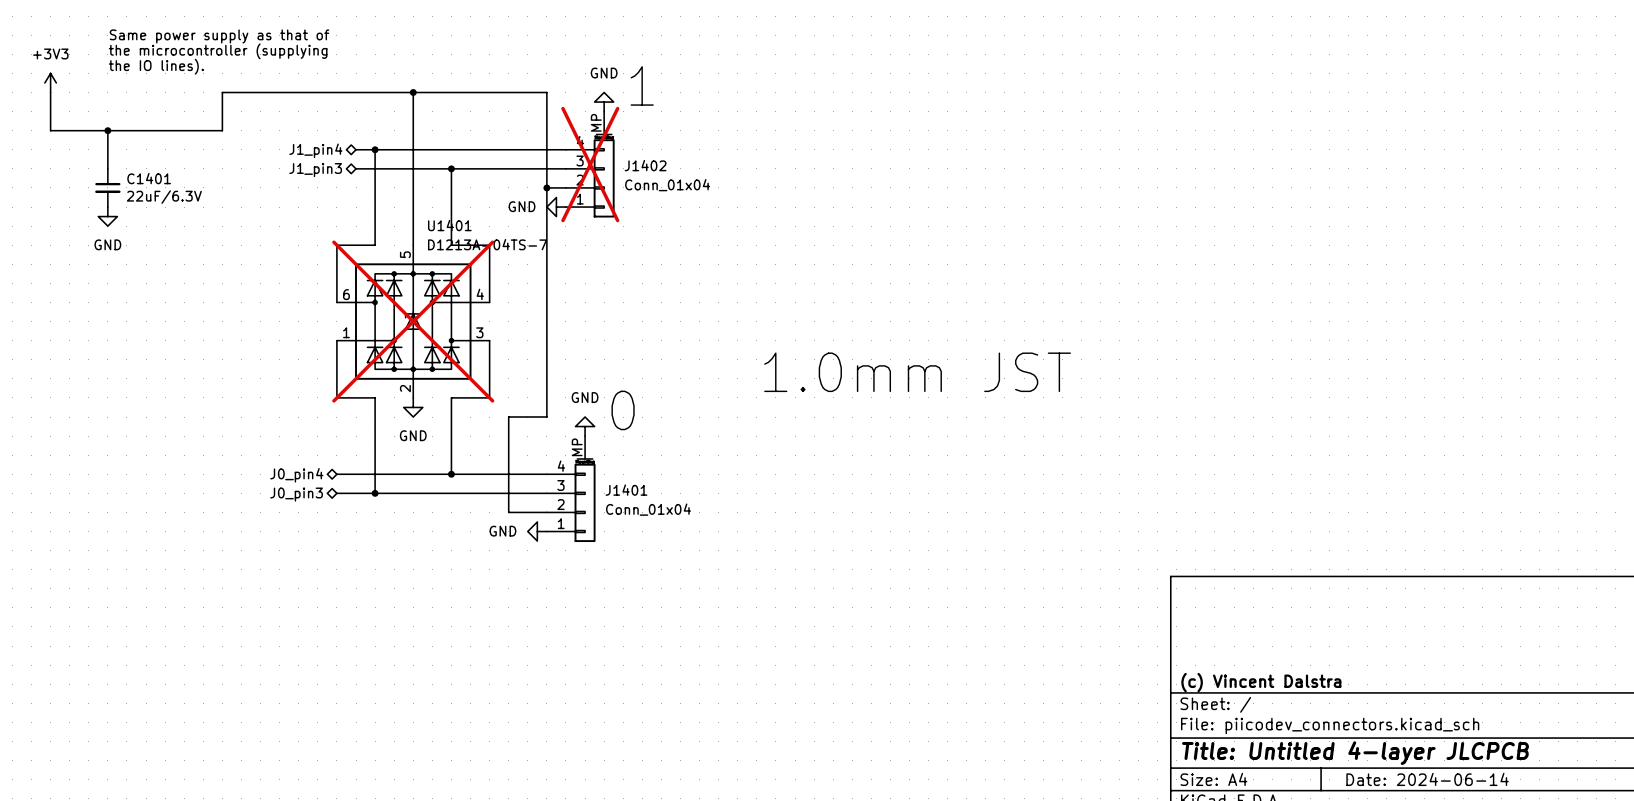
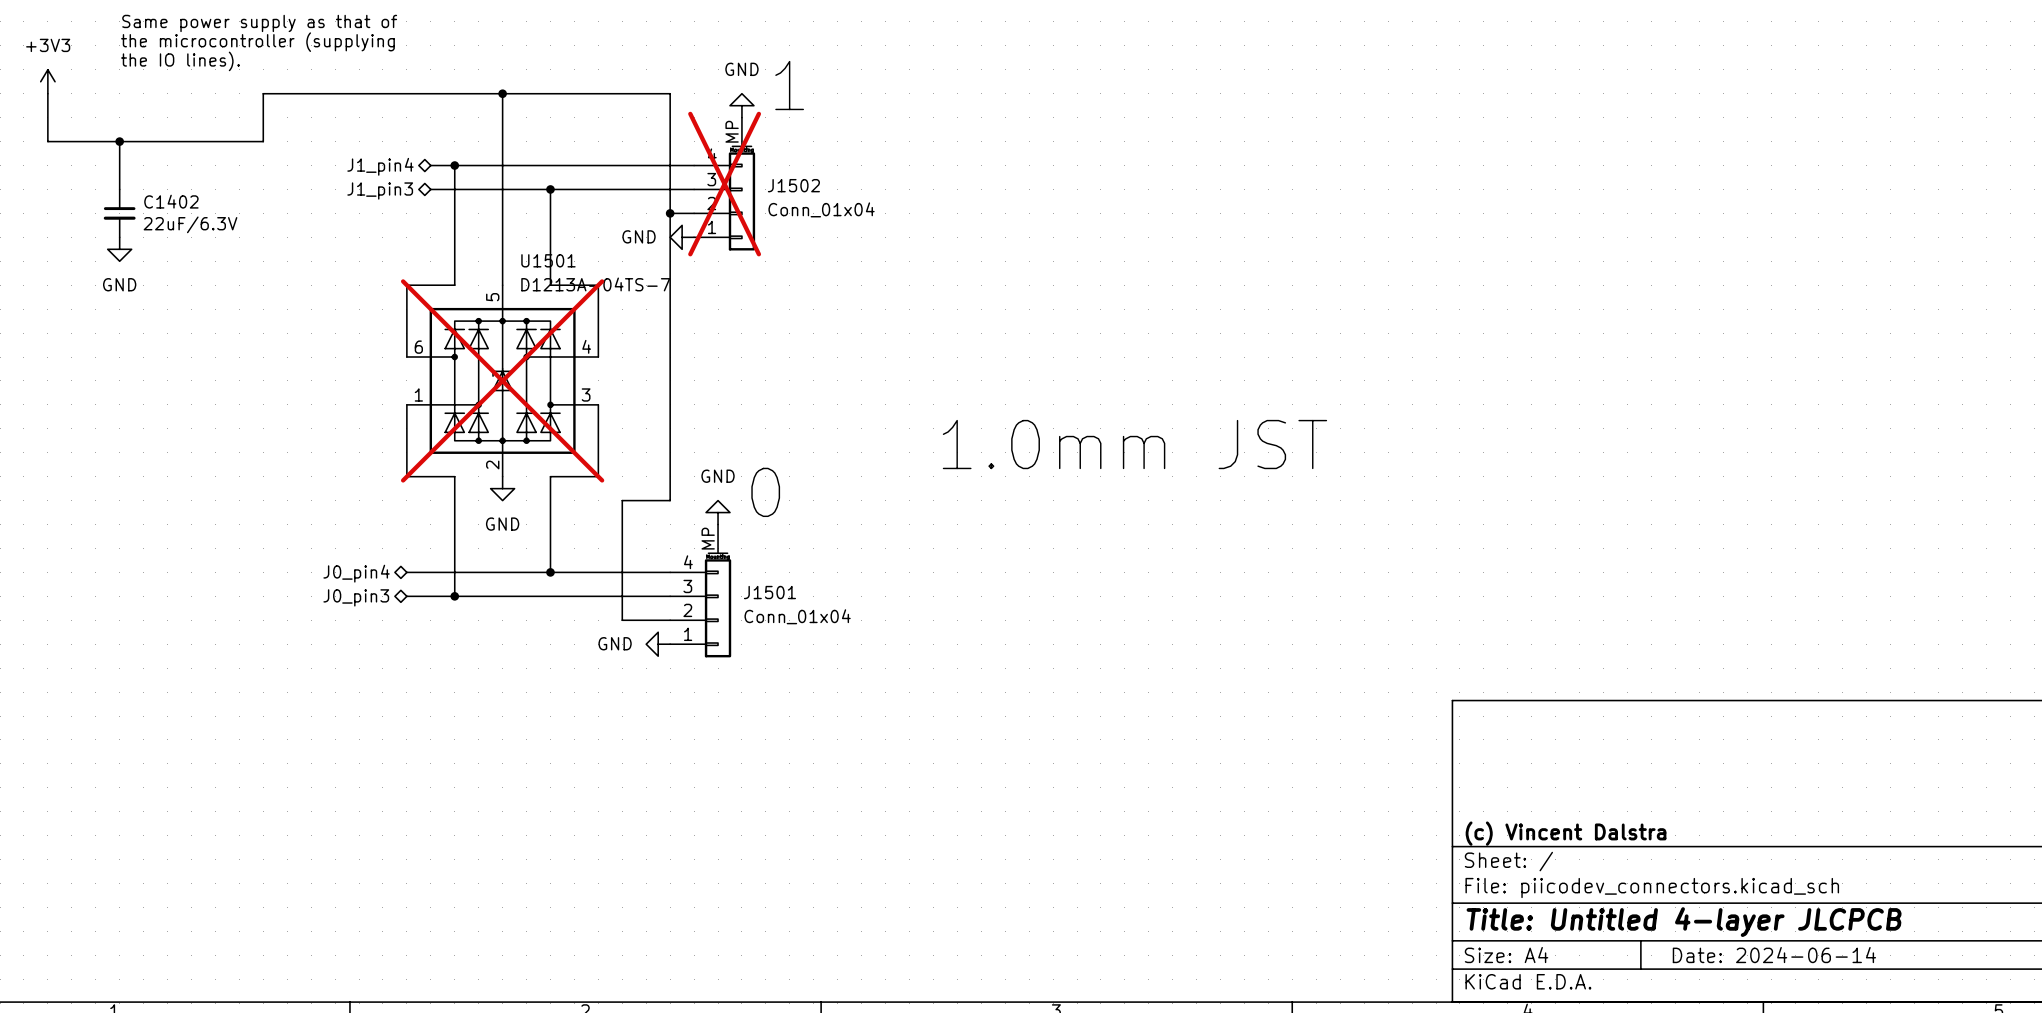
J1402 name: J1402 (645, 165) -> J1502 (793, 185)
C1401 name: C1401 (149, 178) -> C1402 (171, 201)
U1401 name: U1401 (449, 225) -> U1501 (548, 260)
J1401 name: J1401 (626, 490) -> J1501 (769, 592)

